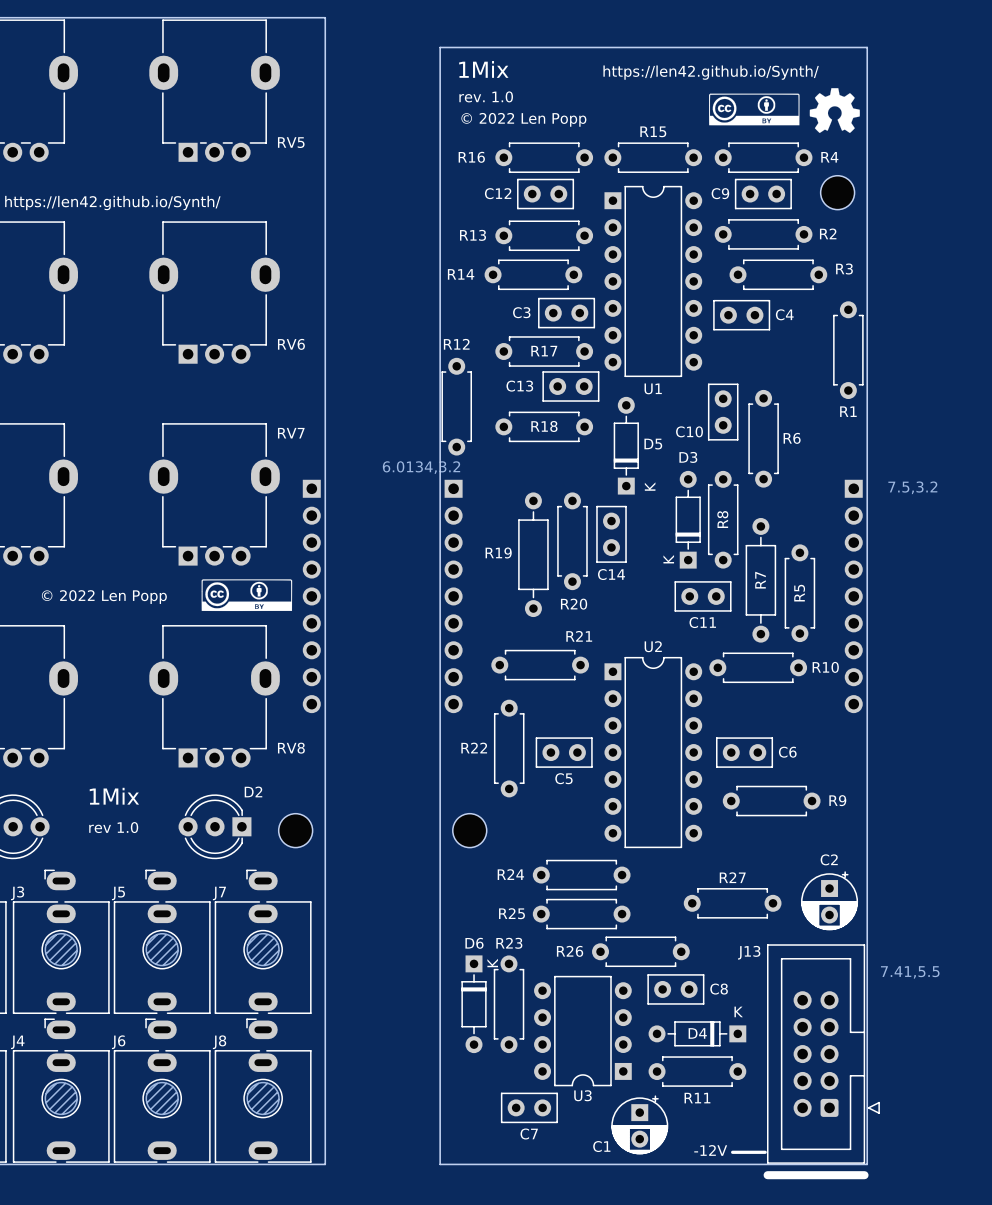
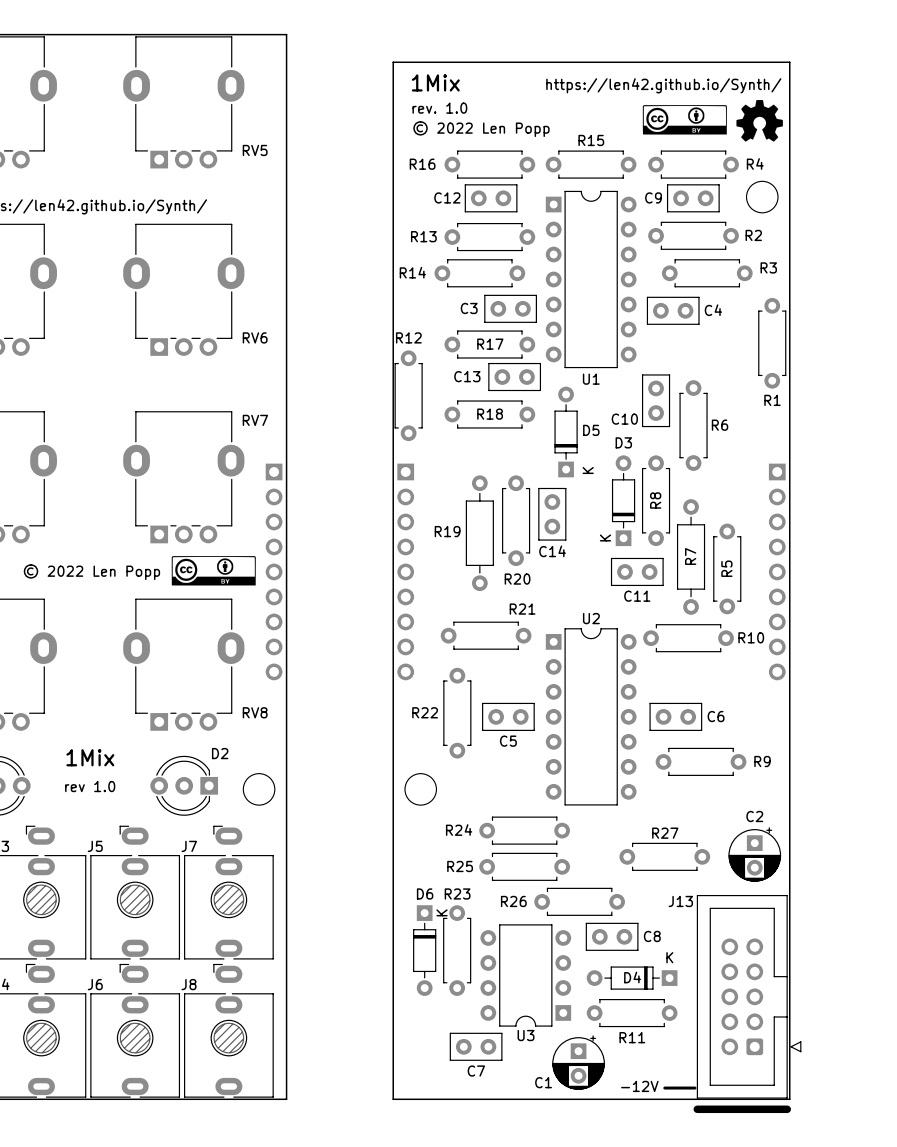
text: 6.0134,3.2 (421, 467) -> none
text: 7.5,3.2 (912, 487) -> none
text: 7.41,5.5 (910, 972) -> none

